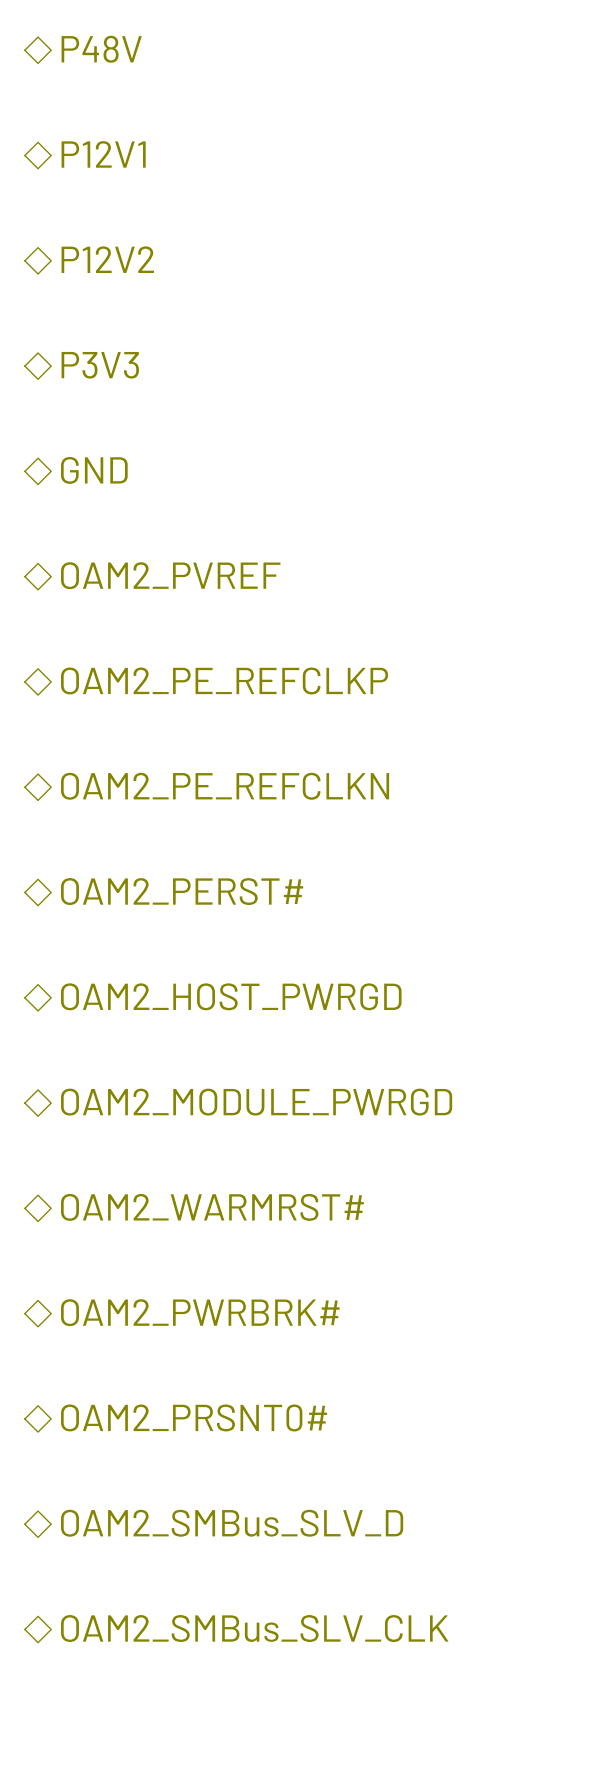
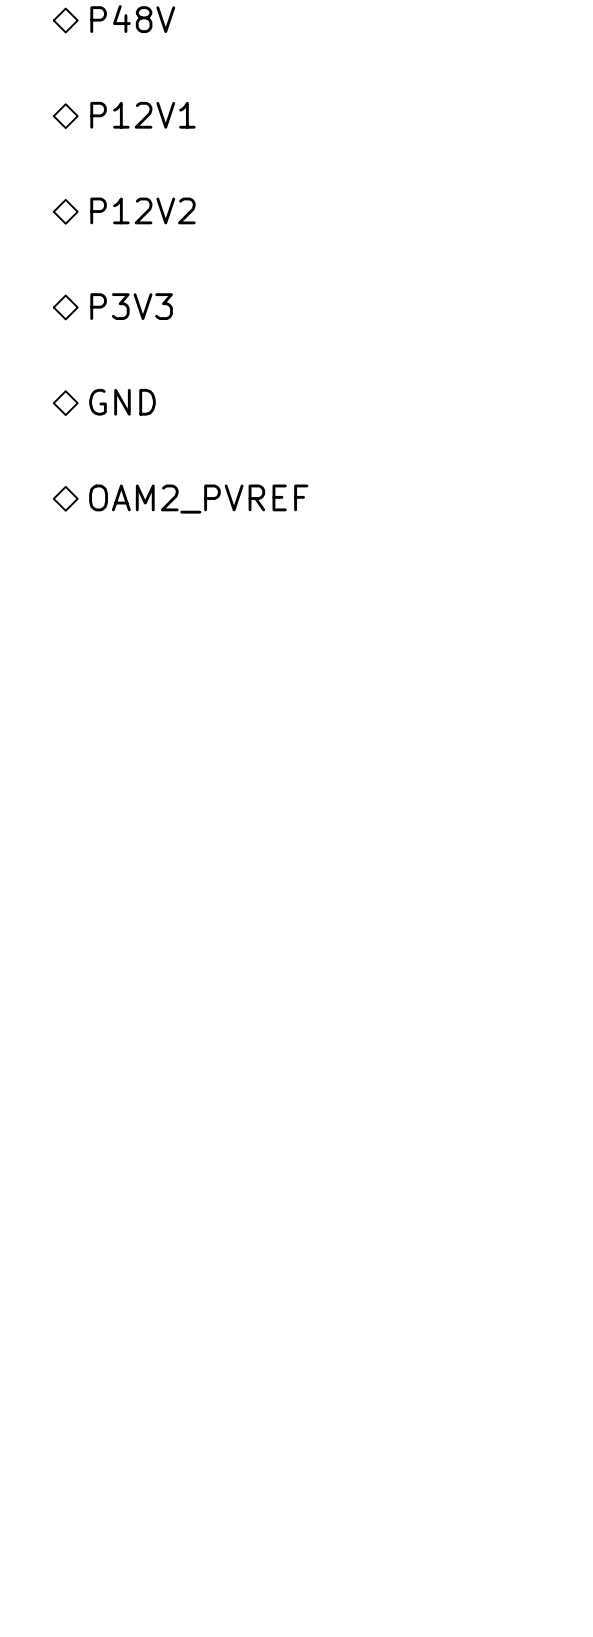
hierarchical label: OAM2_PE_REFCLKP (224, 680) -> none
hierarchical label: OAM2_PE_REFCLKN (225, 786) -> none
hierarchical label: OAM2_PERST# (182, 891) -> none
hierarchical label: OAM2_HOST_PWRGD (231, 996) -> none
hierarchical label: OAM2_MODULE_PWRGD (256, 1102) -> none
hierarchical label: OAM2_WARMRST# (212, 1207) -> none
hierarchical label: OAM2_PWRBRK# (200, 1312) -> none
hierarchical label: OAM2_PRSNT0# (194, 1417) -> none
hierarchical label: OAM2_SMBus_SLV_D (232, 1523) -> none
hierarchical label: OAM2_SMBus_SLV_CLK (254, 1628) -> none

